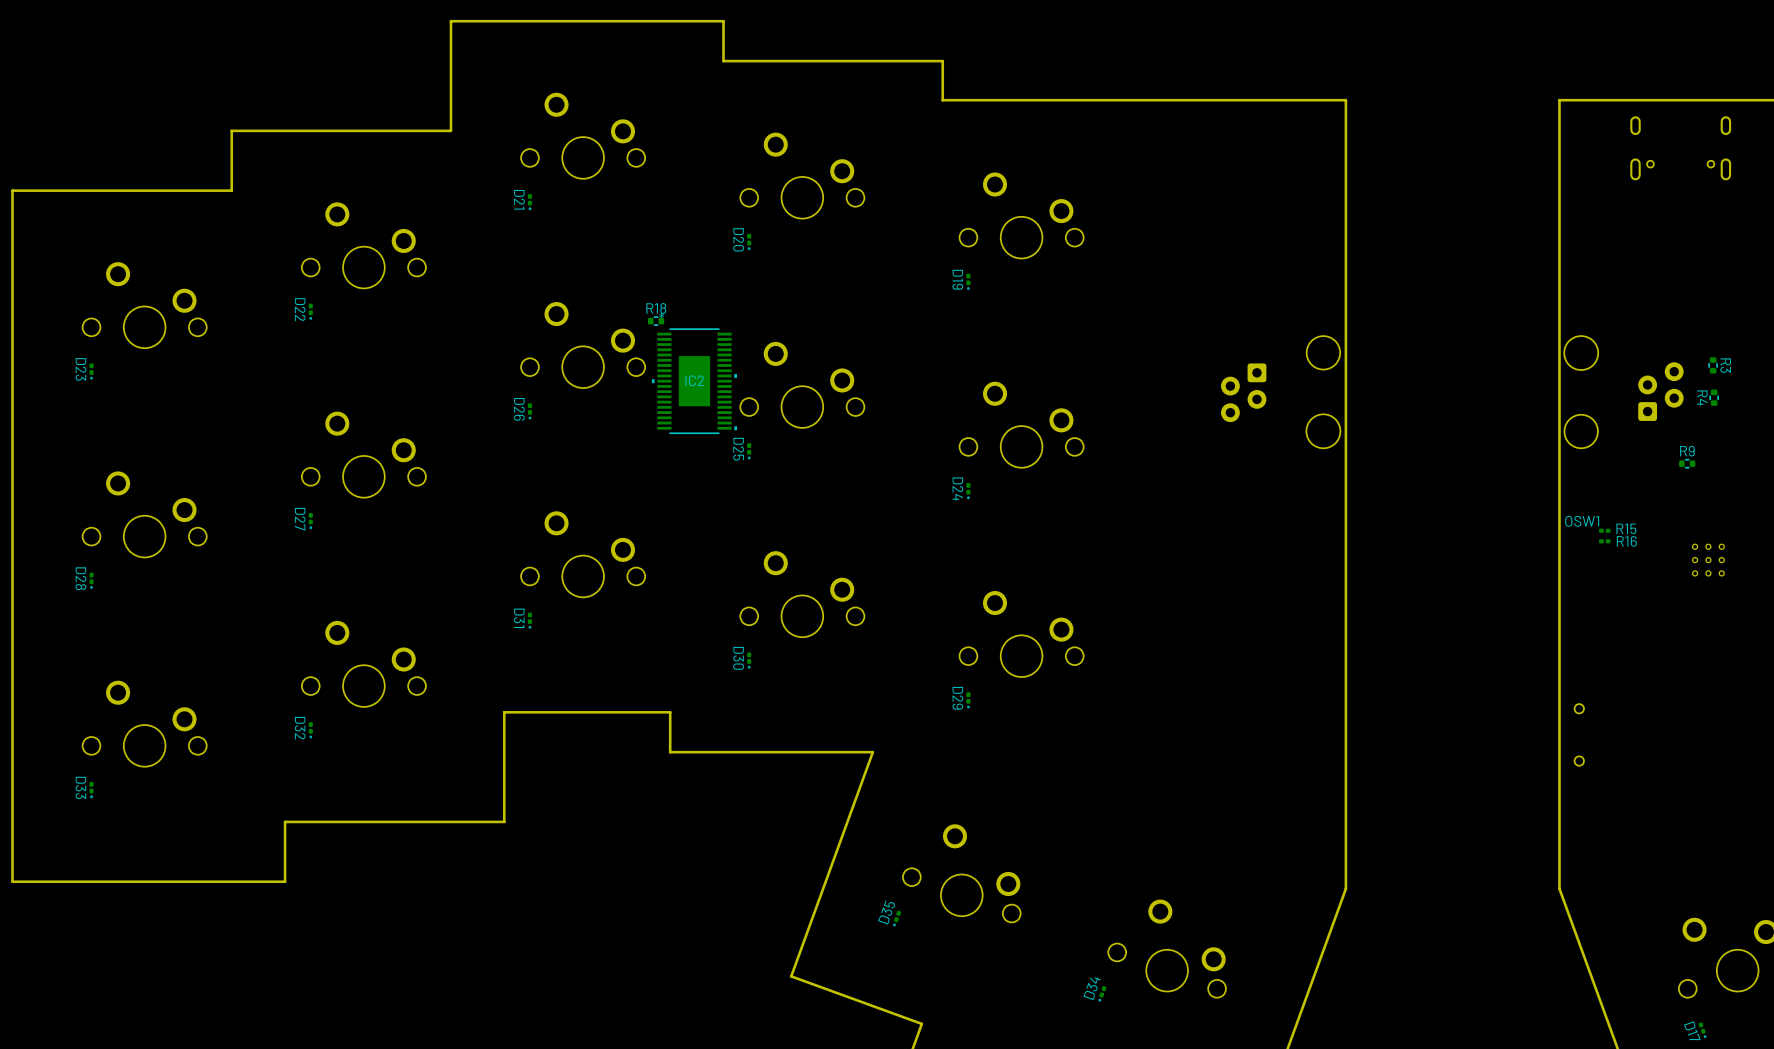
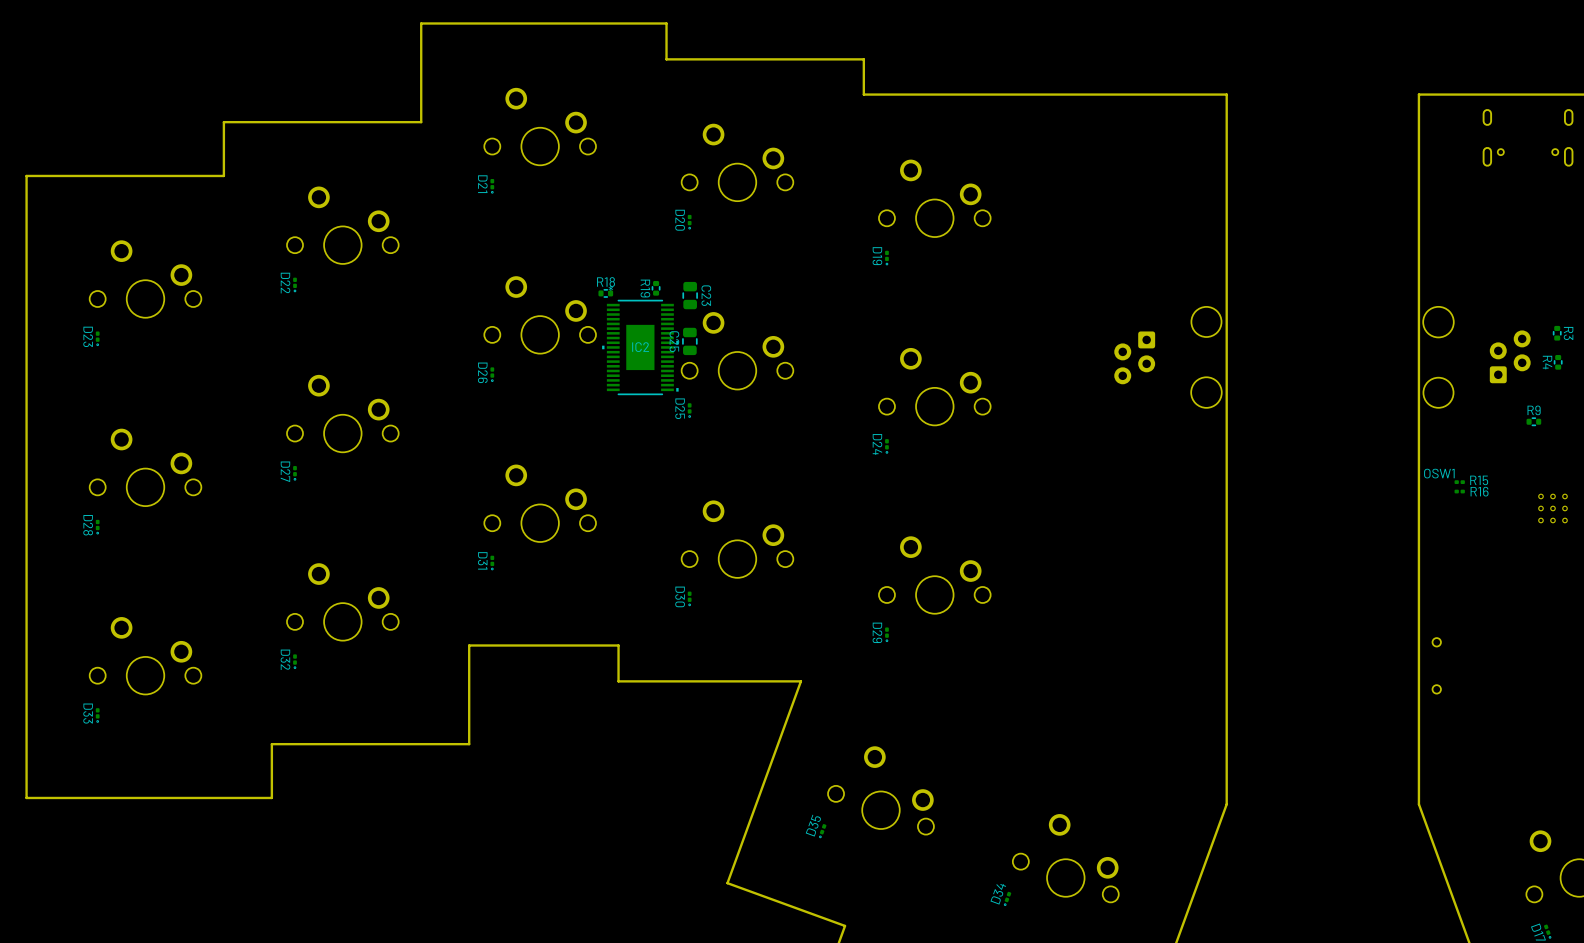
R19: none -> (656, 288)
C23: none -> (690, 295)
C25: none -> (689, 341)

